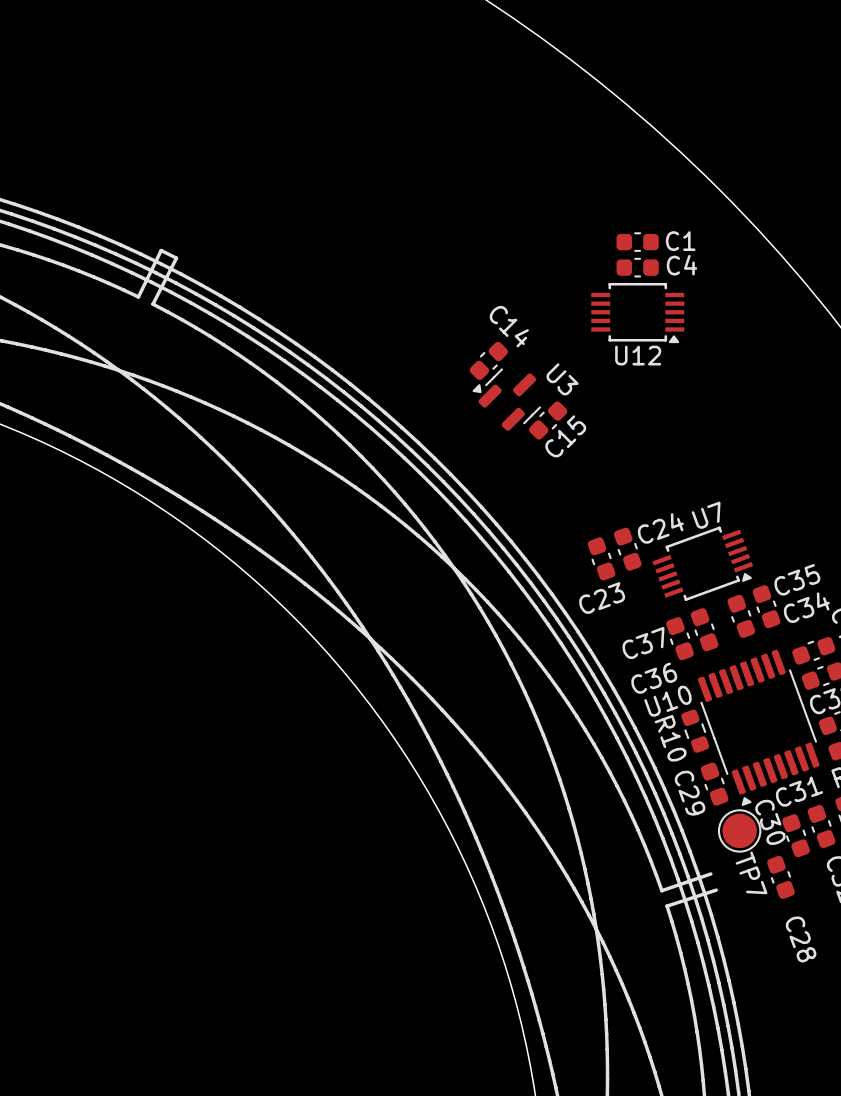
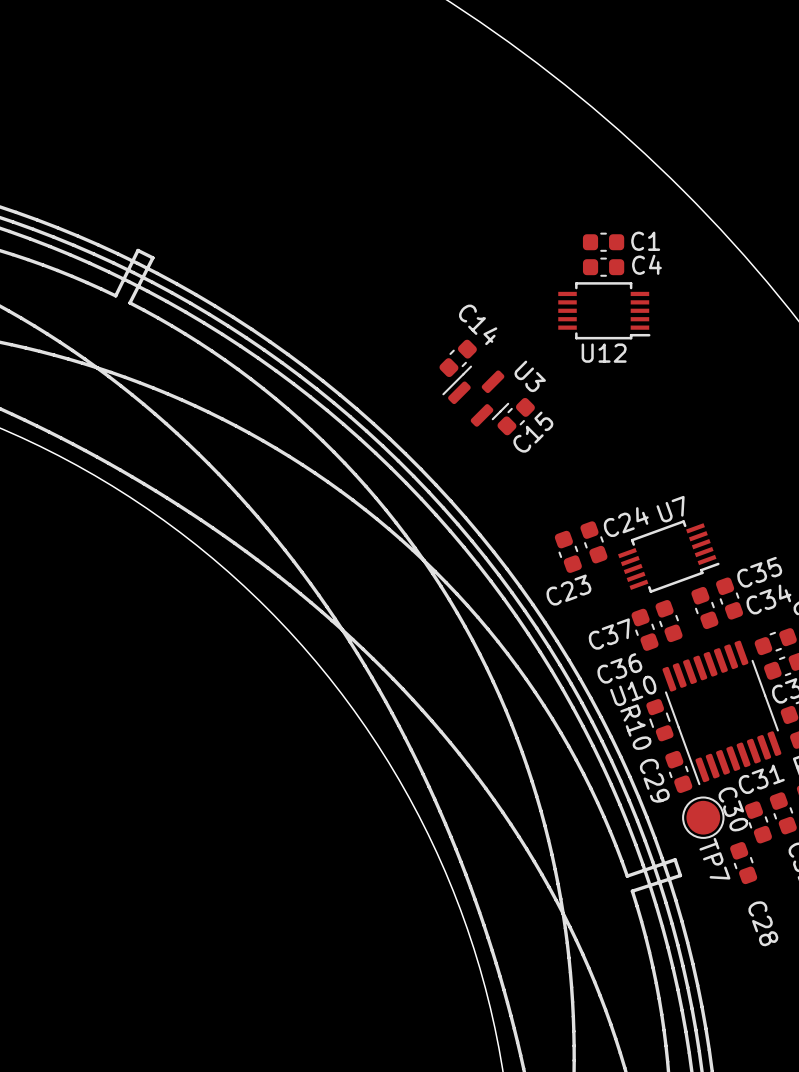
U12 footprint: [591, 282, 685, 344] -> [558, 282, 651, 340]
U3 footprint: [472, 368, 542, 431] -> [442, 365, 510, 427]
U7 footprint: [652, 526, 754, 601] -> [618, 520, 720, 593]
U10 footprint: [697, 649, 820, 806] -> [662, 640, 782, 786]
line: none -> (675, 859) (680, 875)

